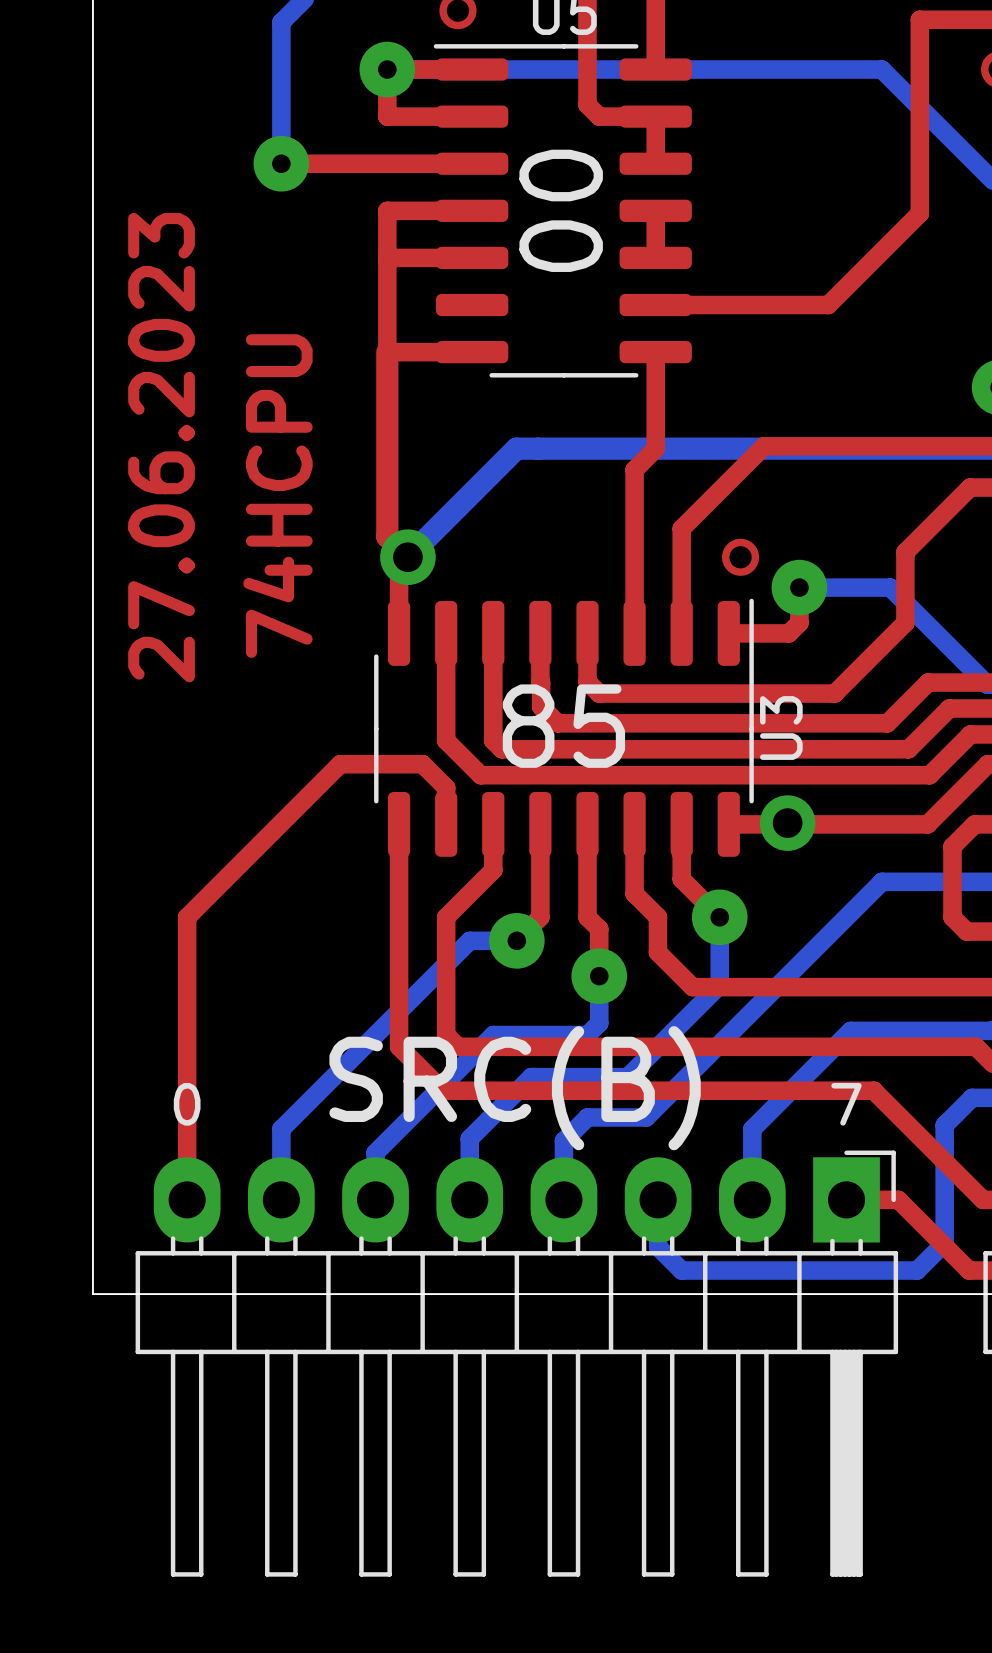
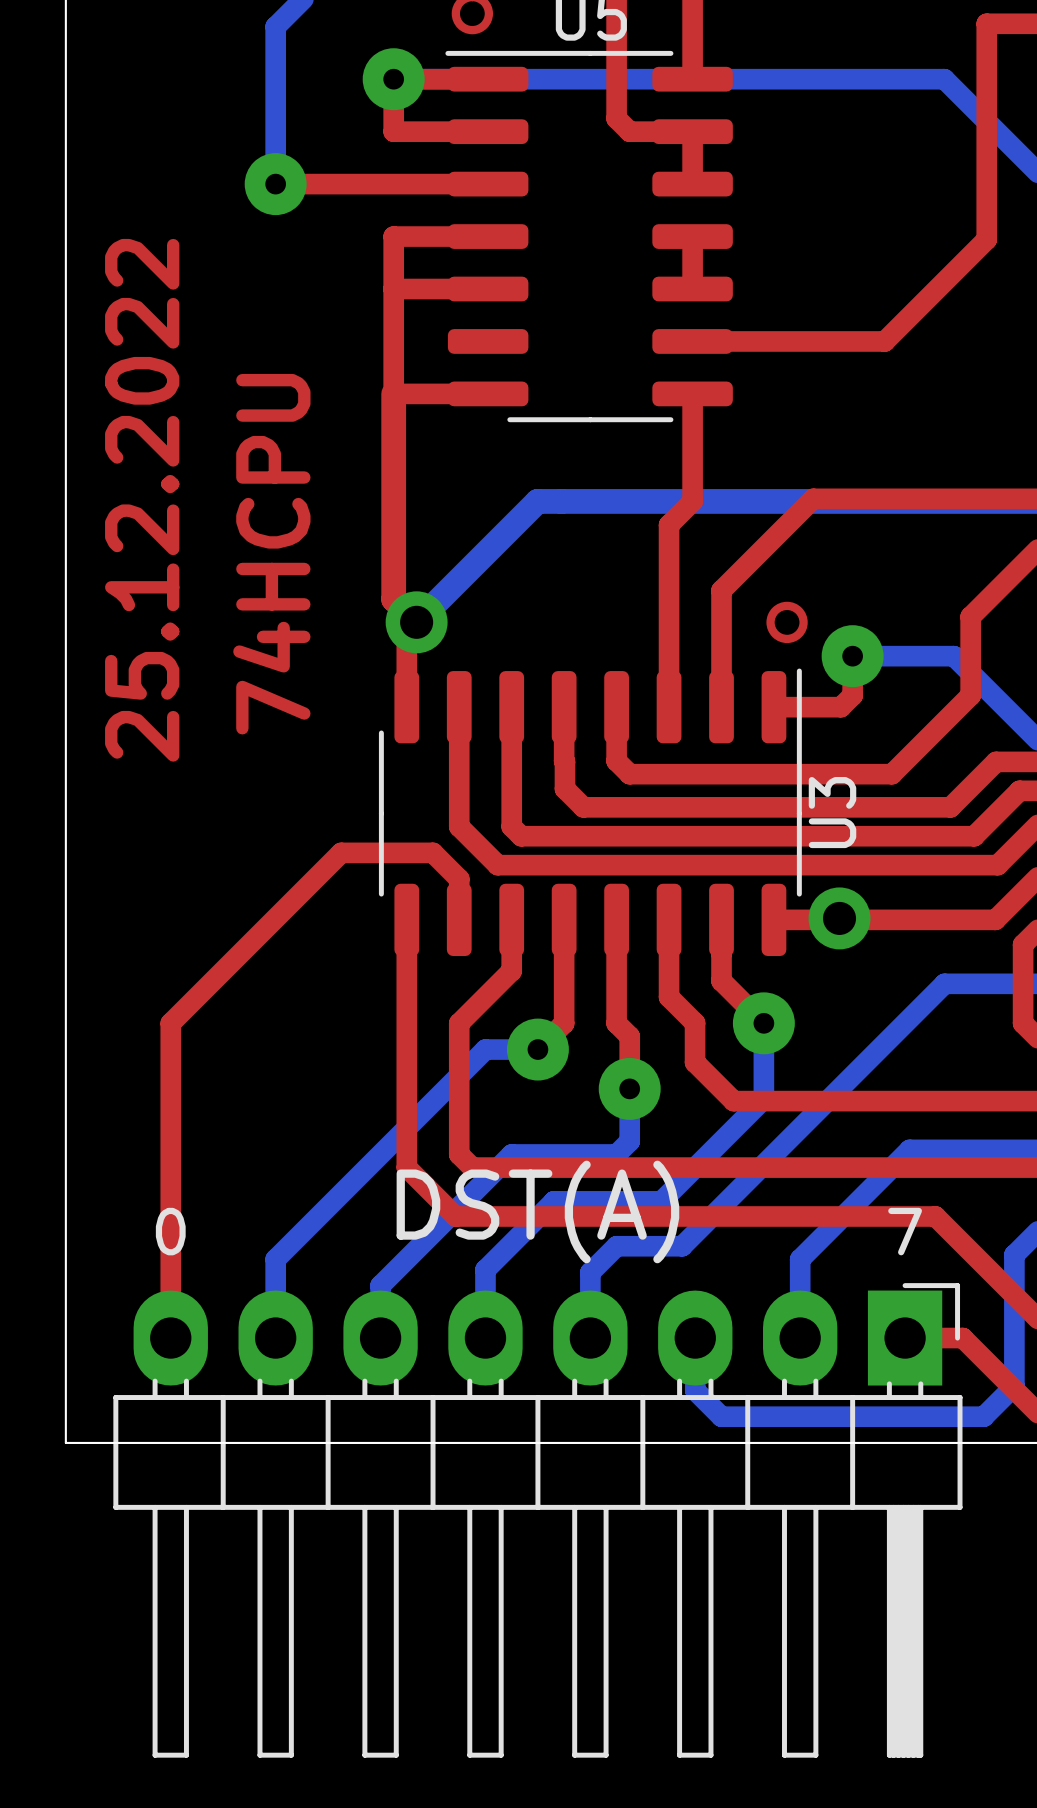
text: 00 (561, 210) -> none
text: 27.06.2023 (161, 447) -> 25.12.2022 (142, 500)
text: 85 (563, 726) -> none
text: SRC(B) (515, 1088) -> DST(A) (537, 1211)

